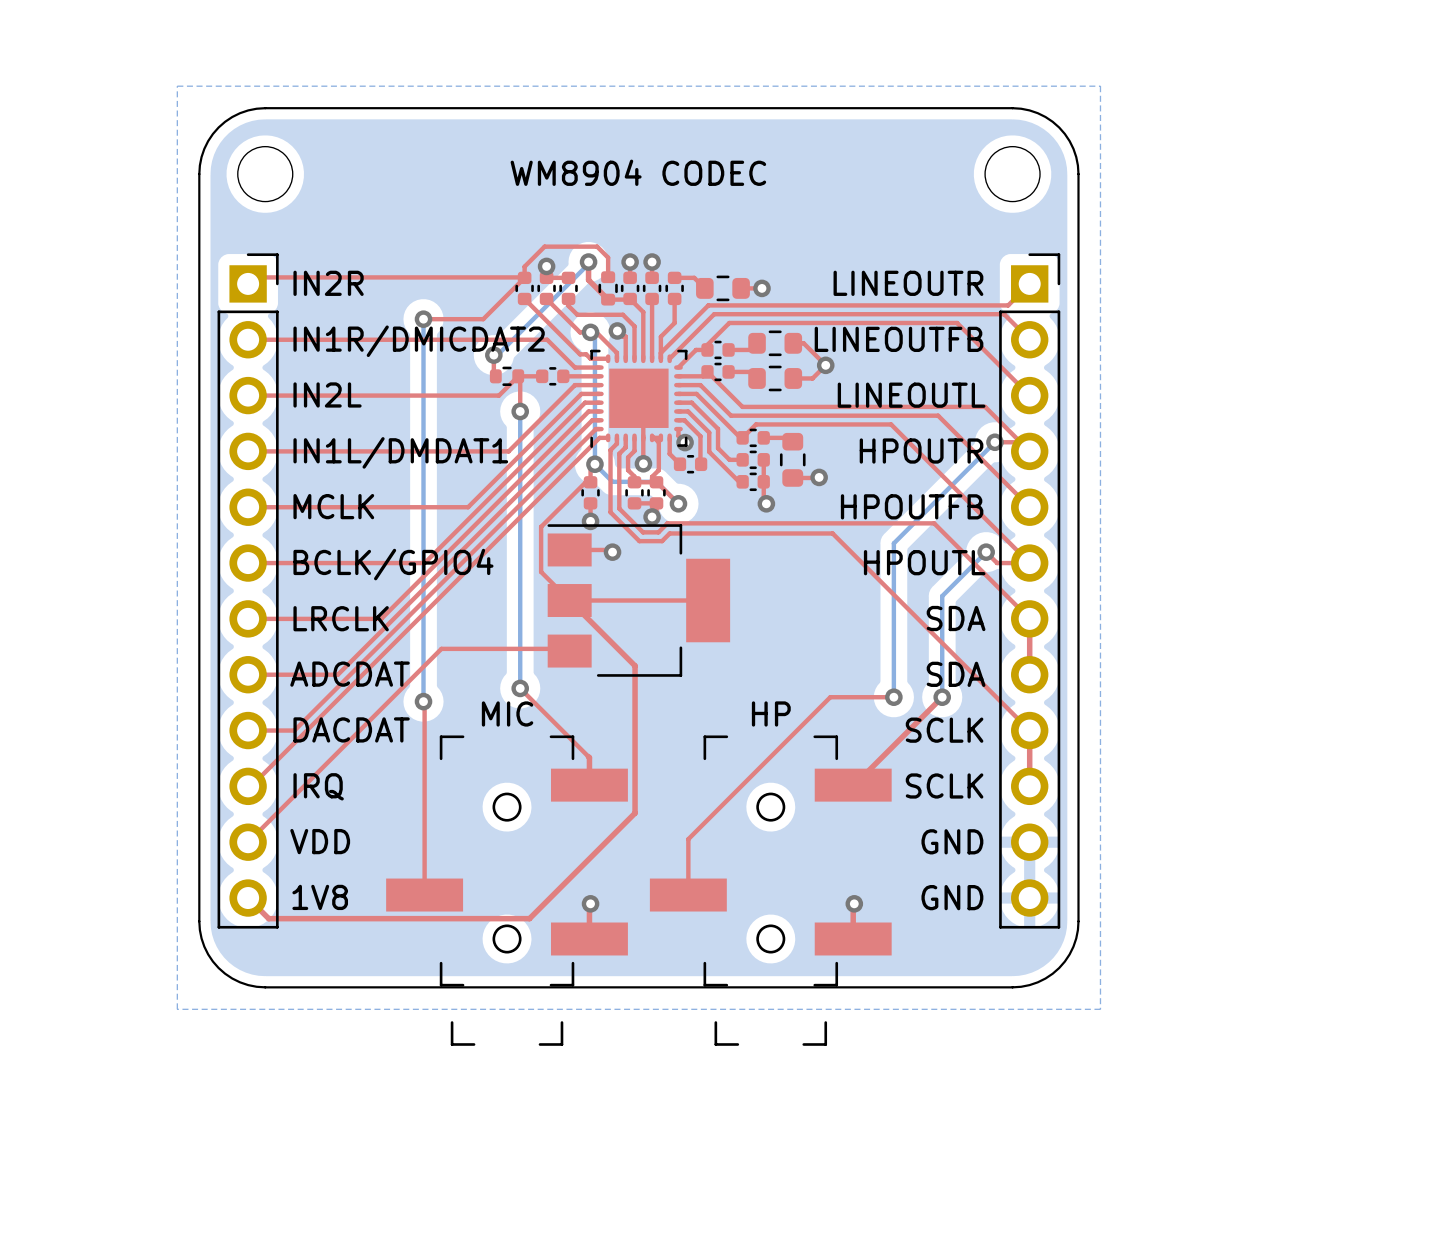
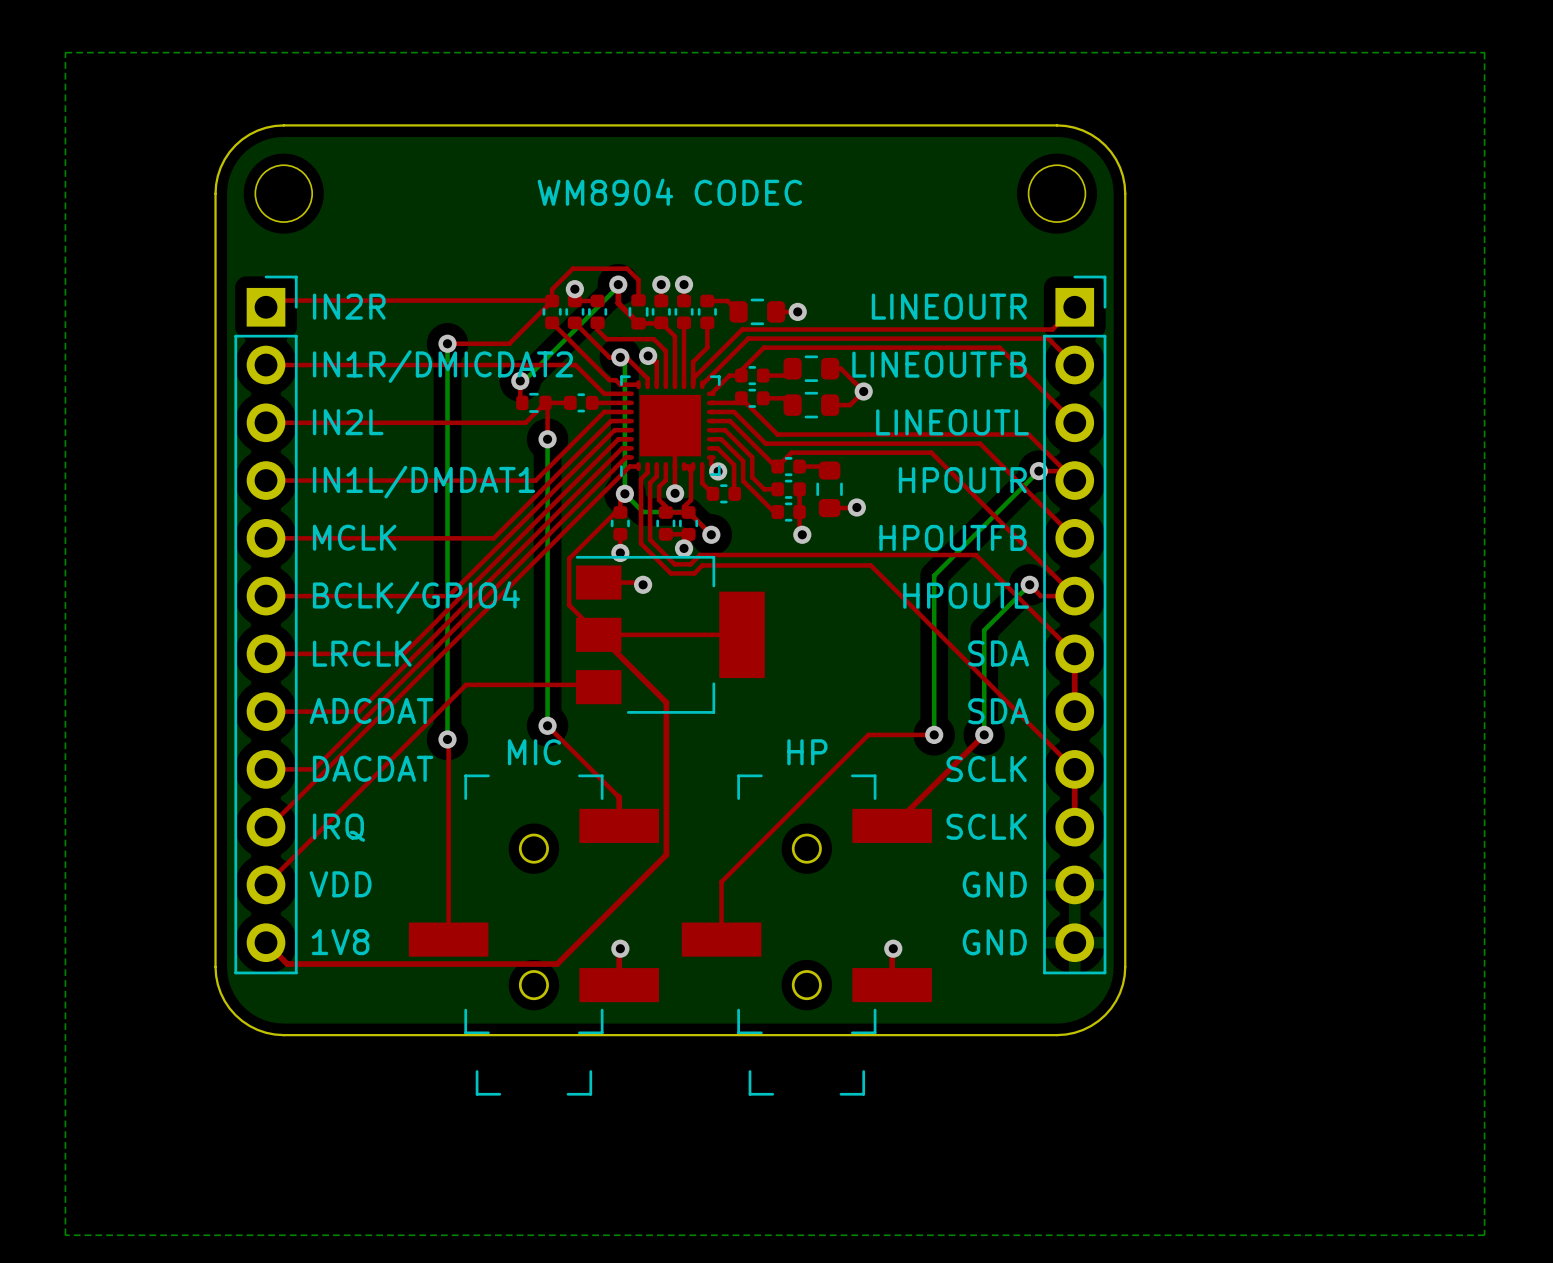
bottom zone outline: (177, 86) (177, 1009) (1100, 1009) (1100, 86) (177, 86) -> (65, 52) (65, 1235) (1484, 1235) (1484, 52) (65, 52)

